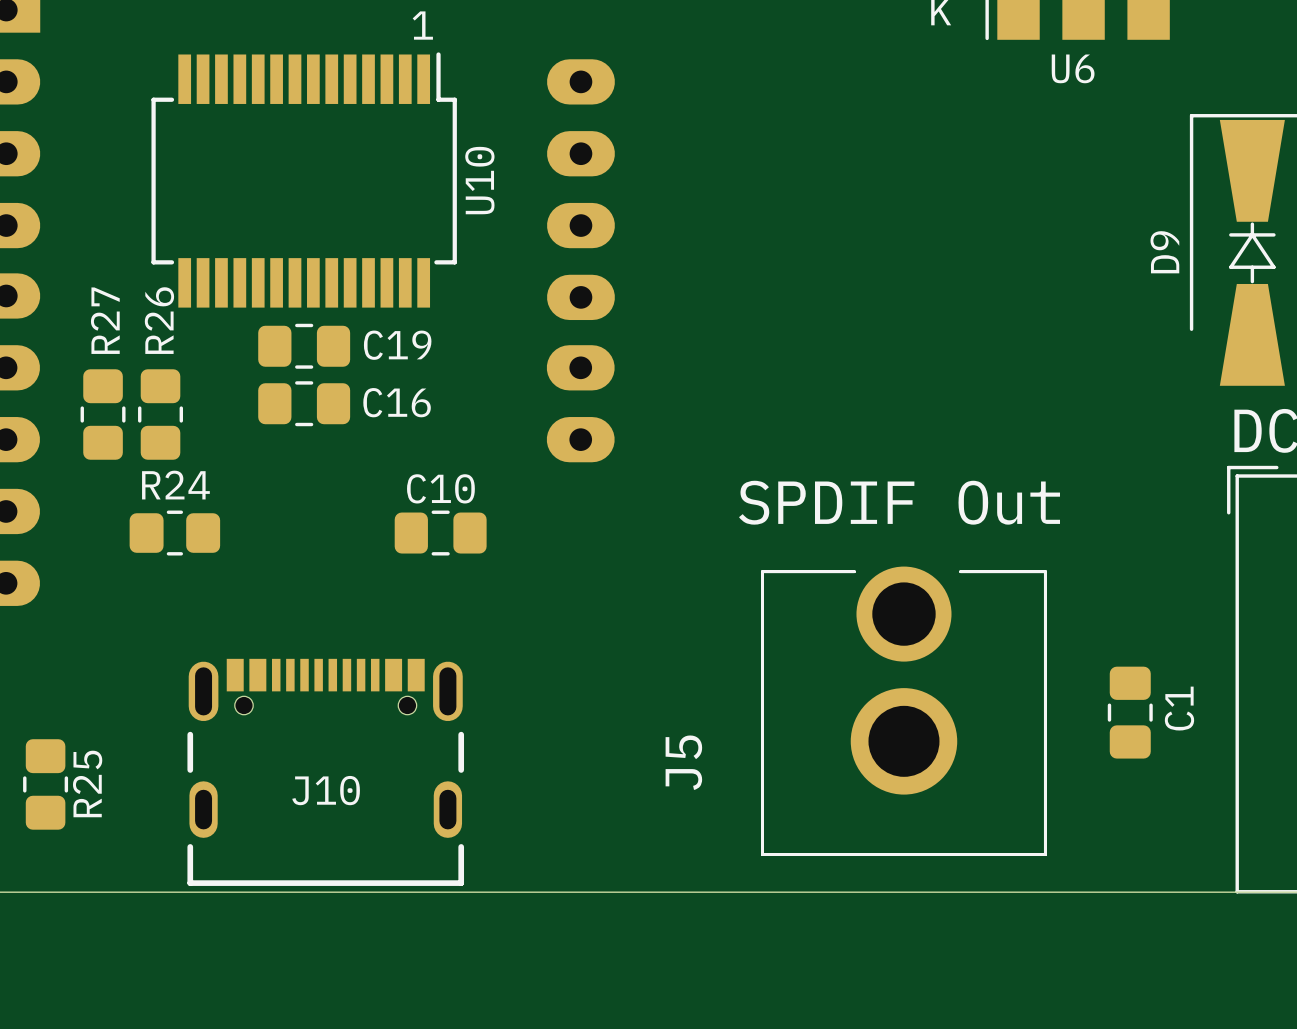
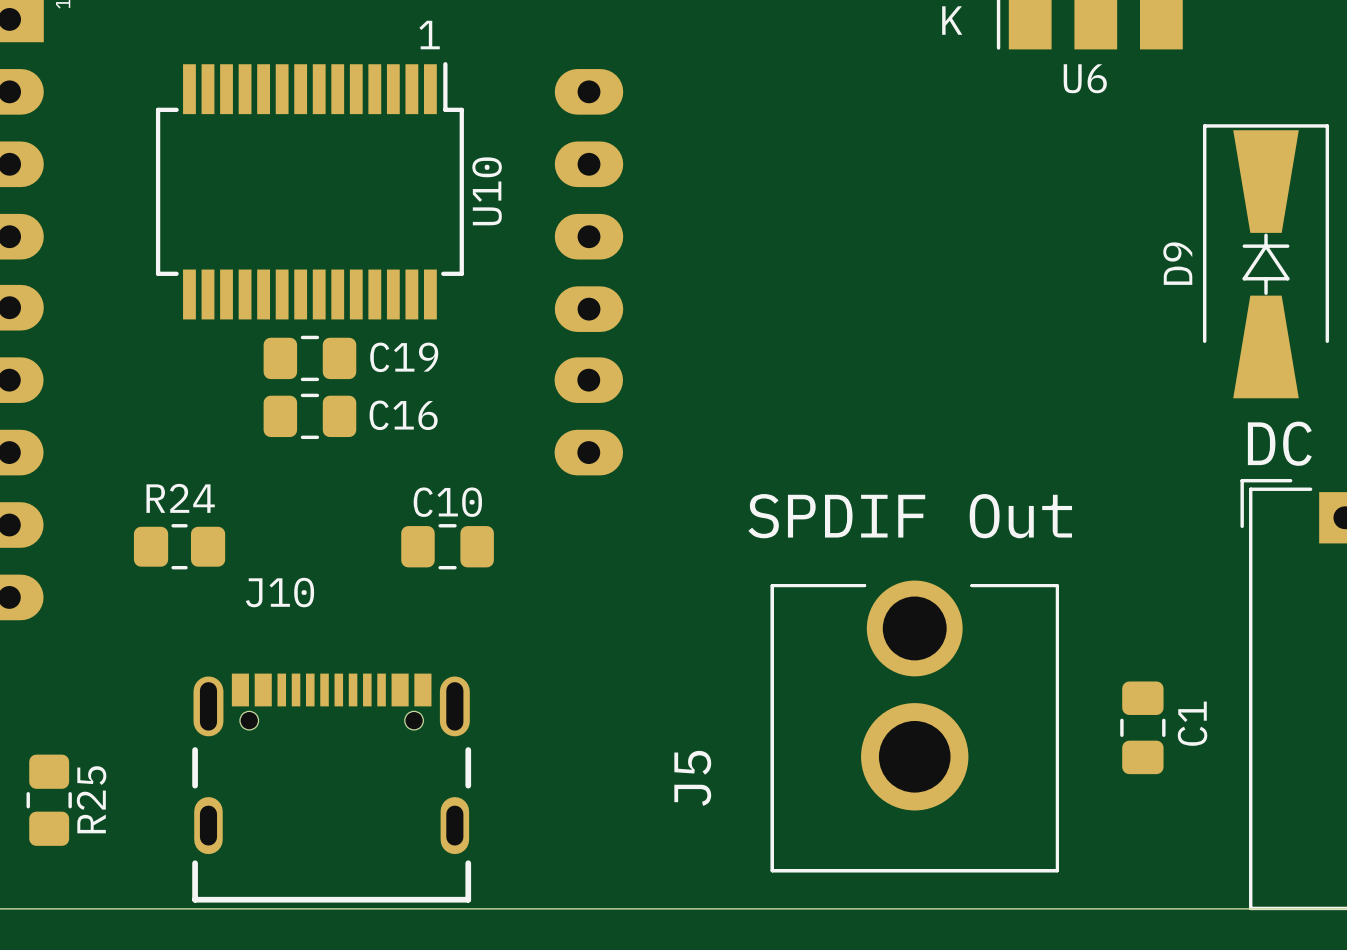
R27: (103, 414) -> none
R26: (160, 414) -> none
J10 name position: J10 (326, 790) -> J10 (279, 592)

